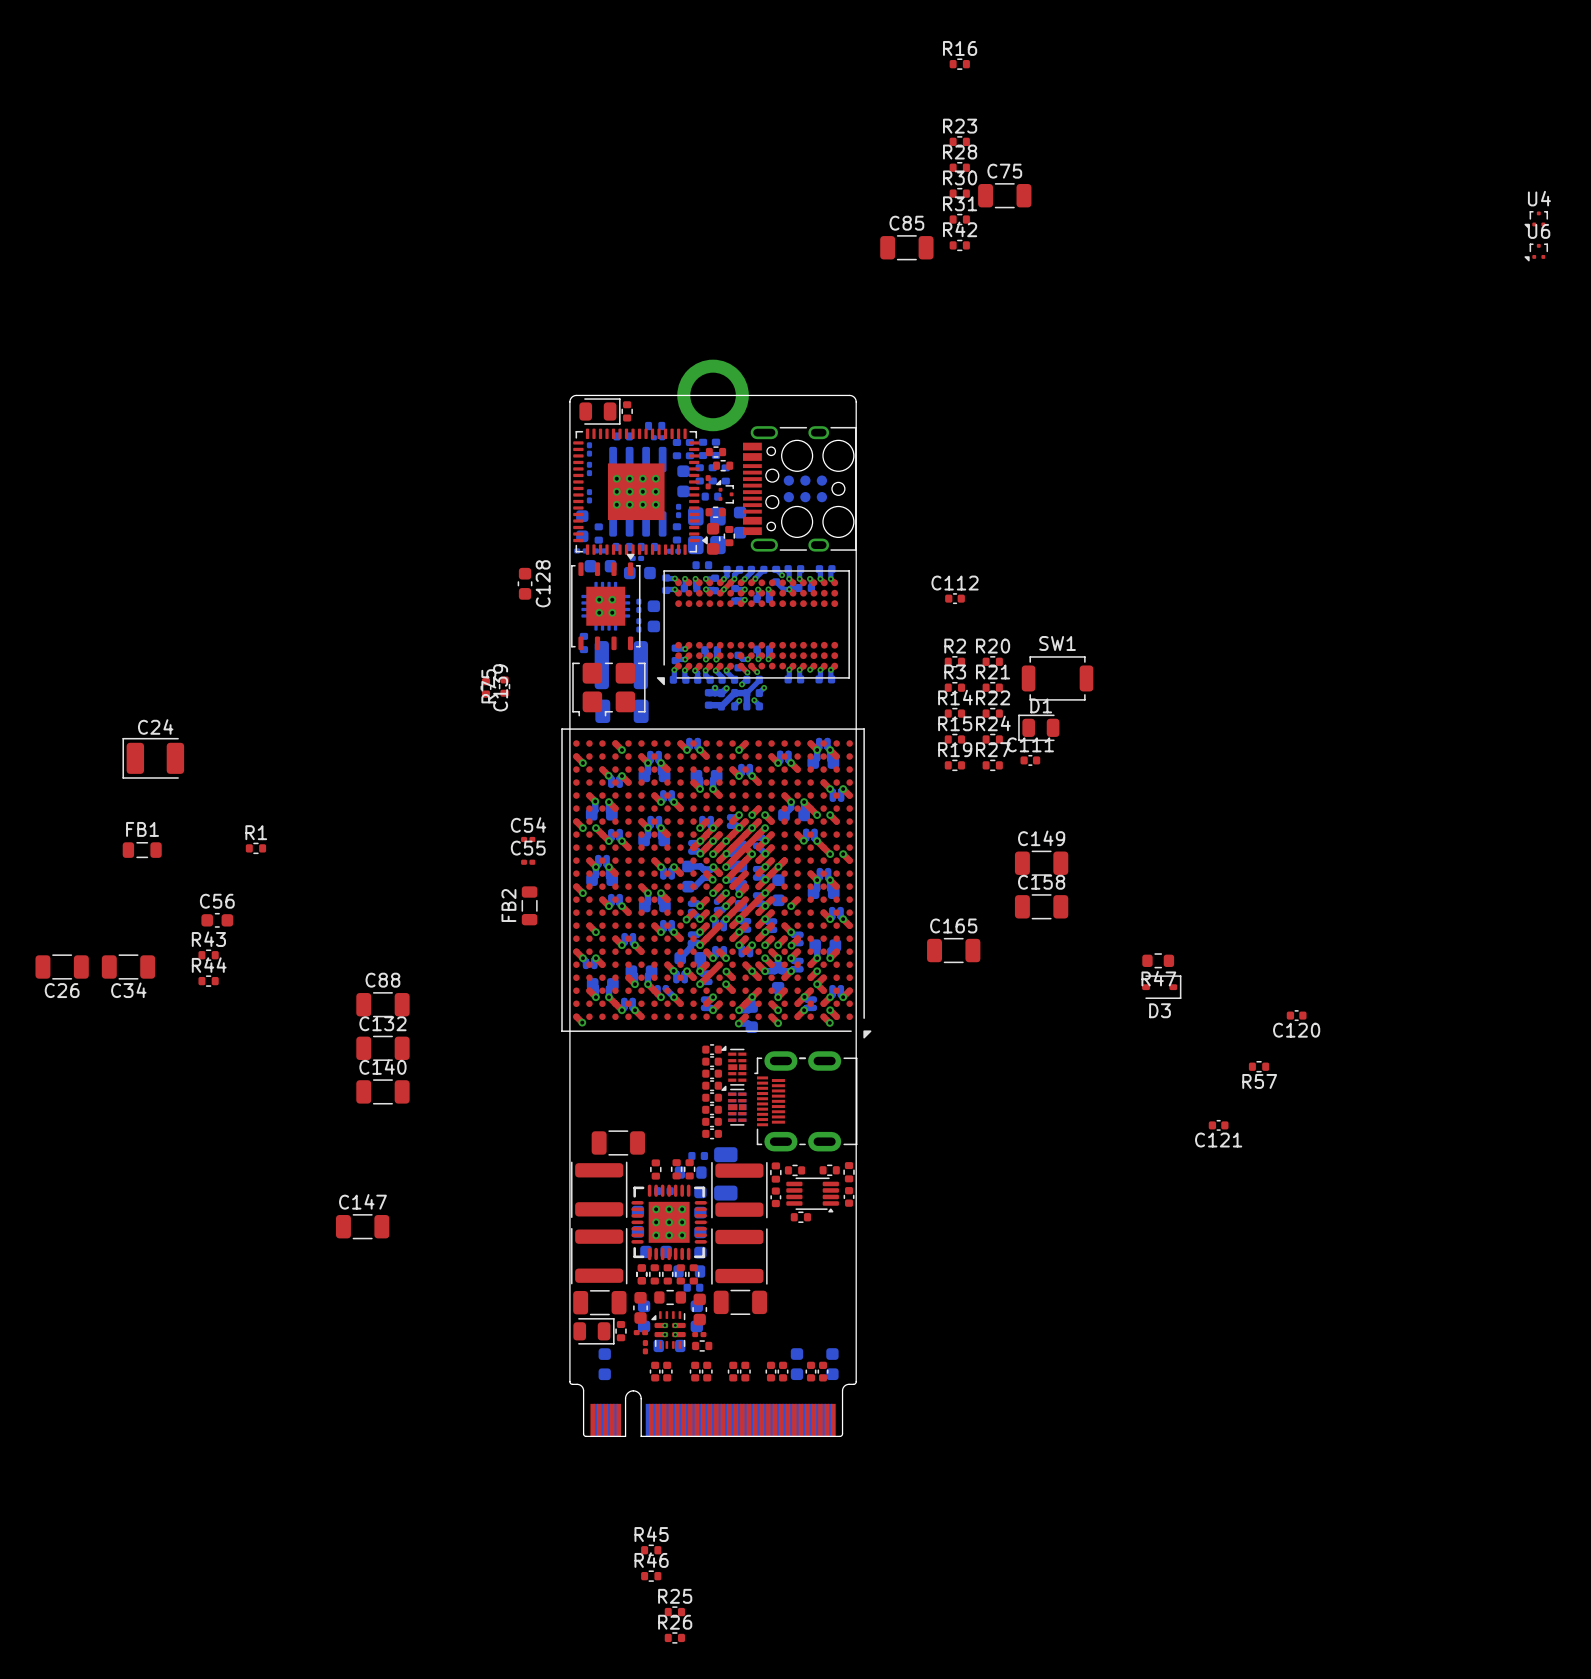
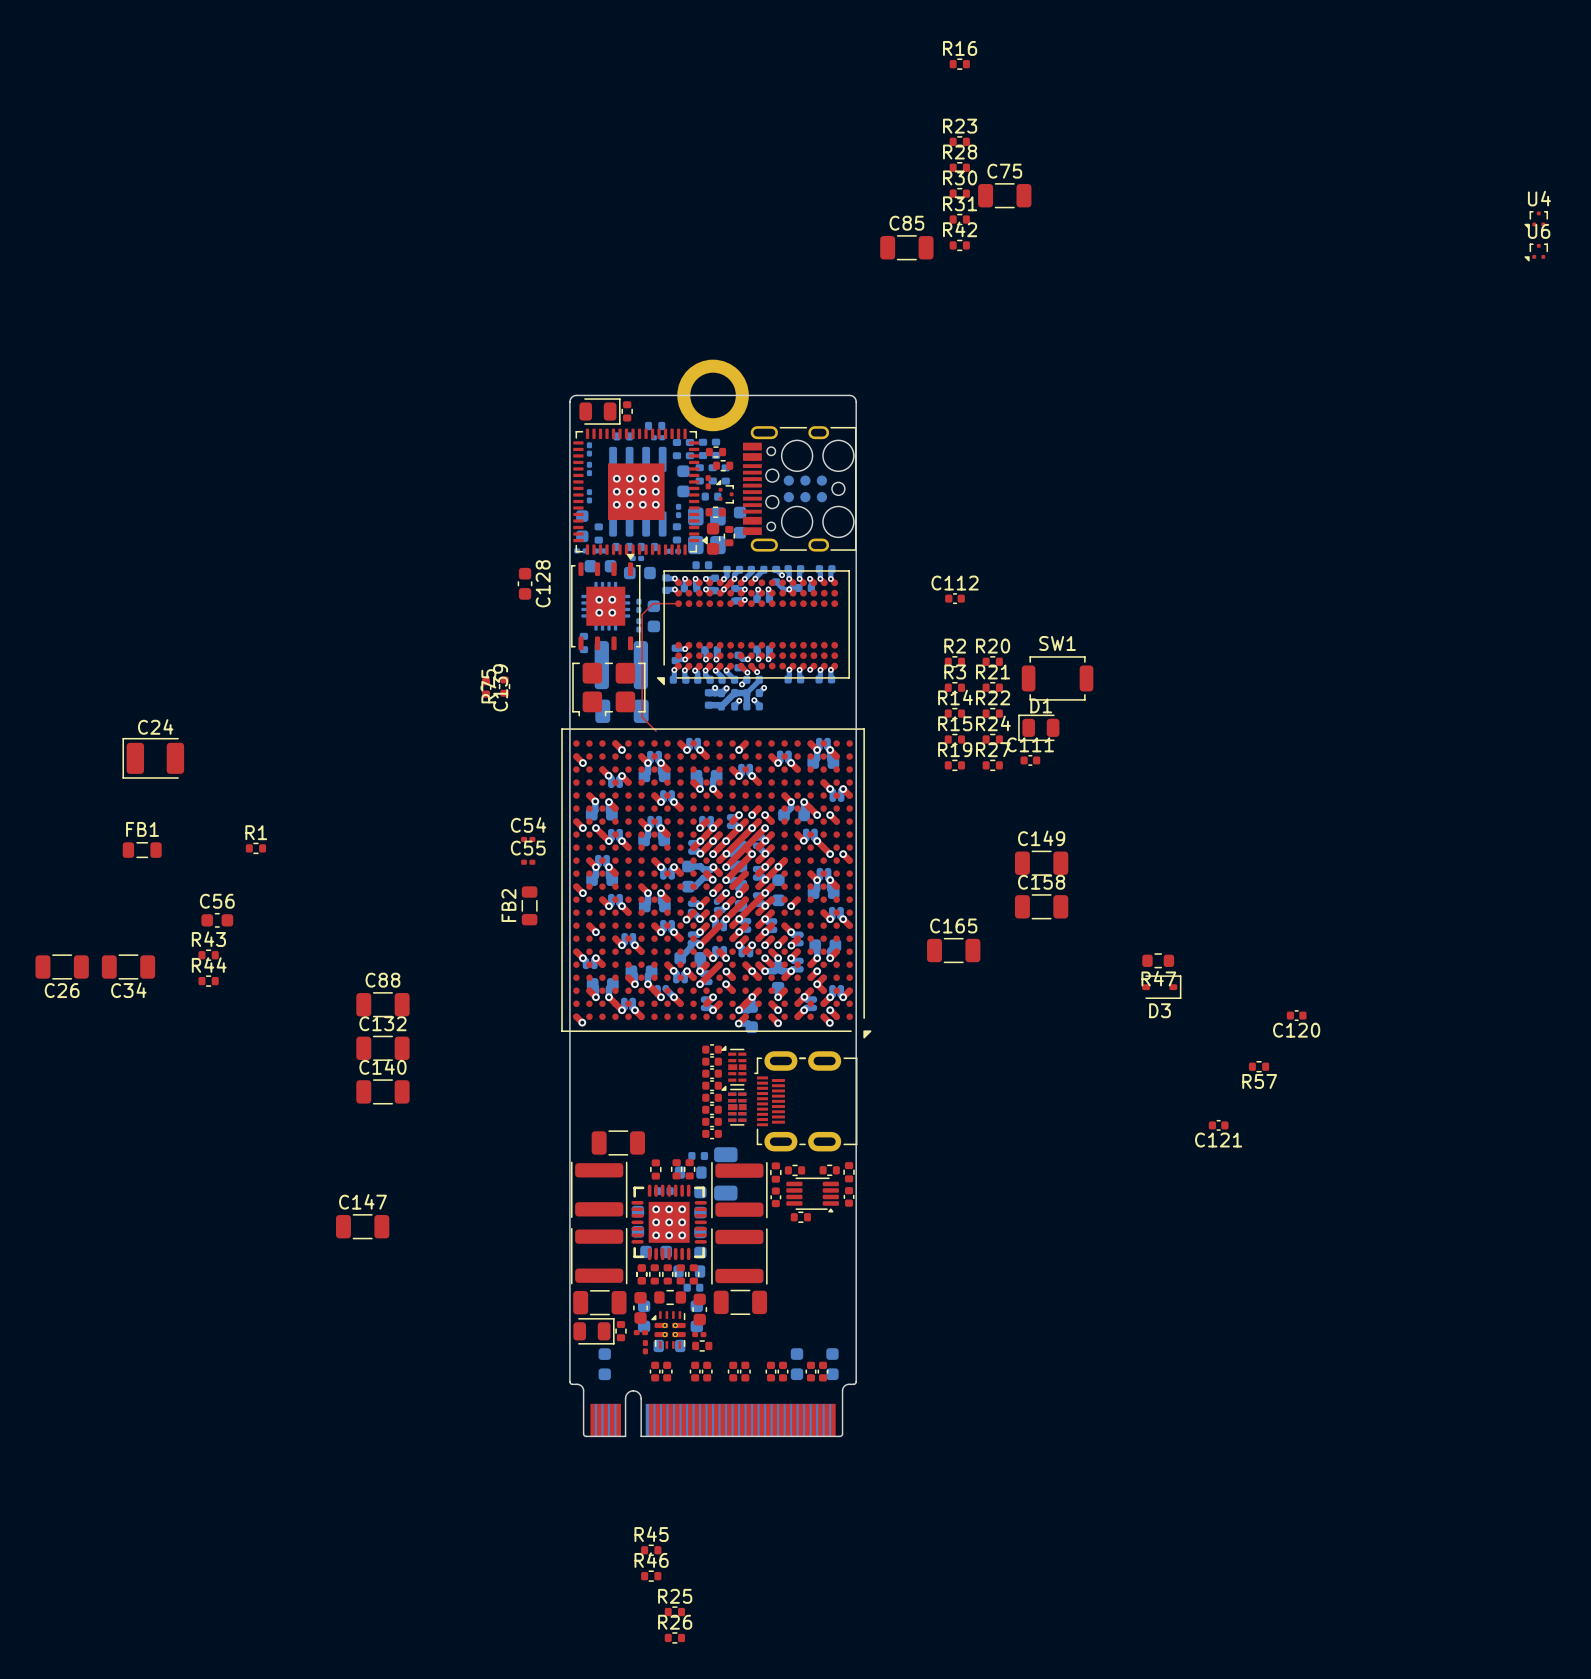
top track: none -> (678, 603) (653, 603) (642, 614) (642, 717) (656, 731)

